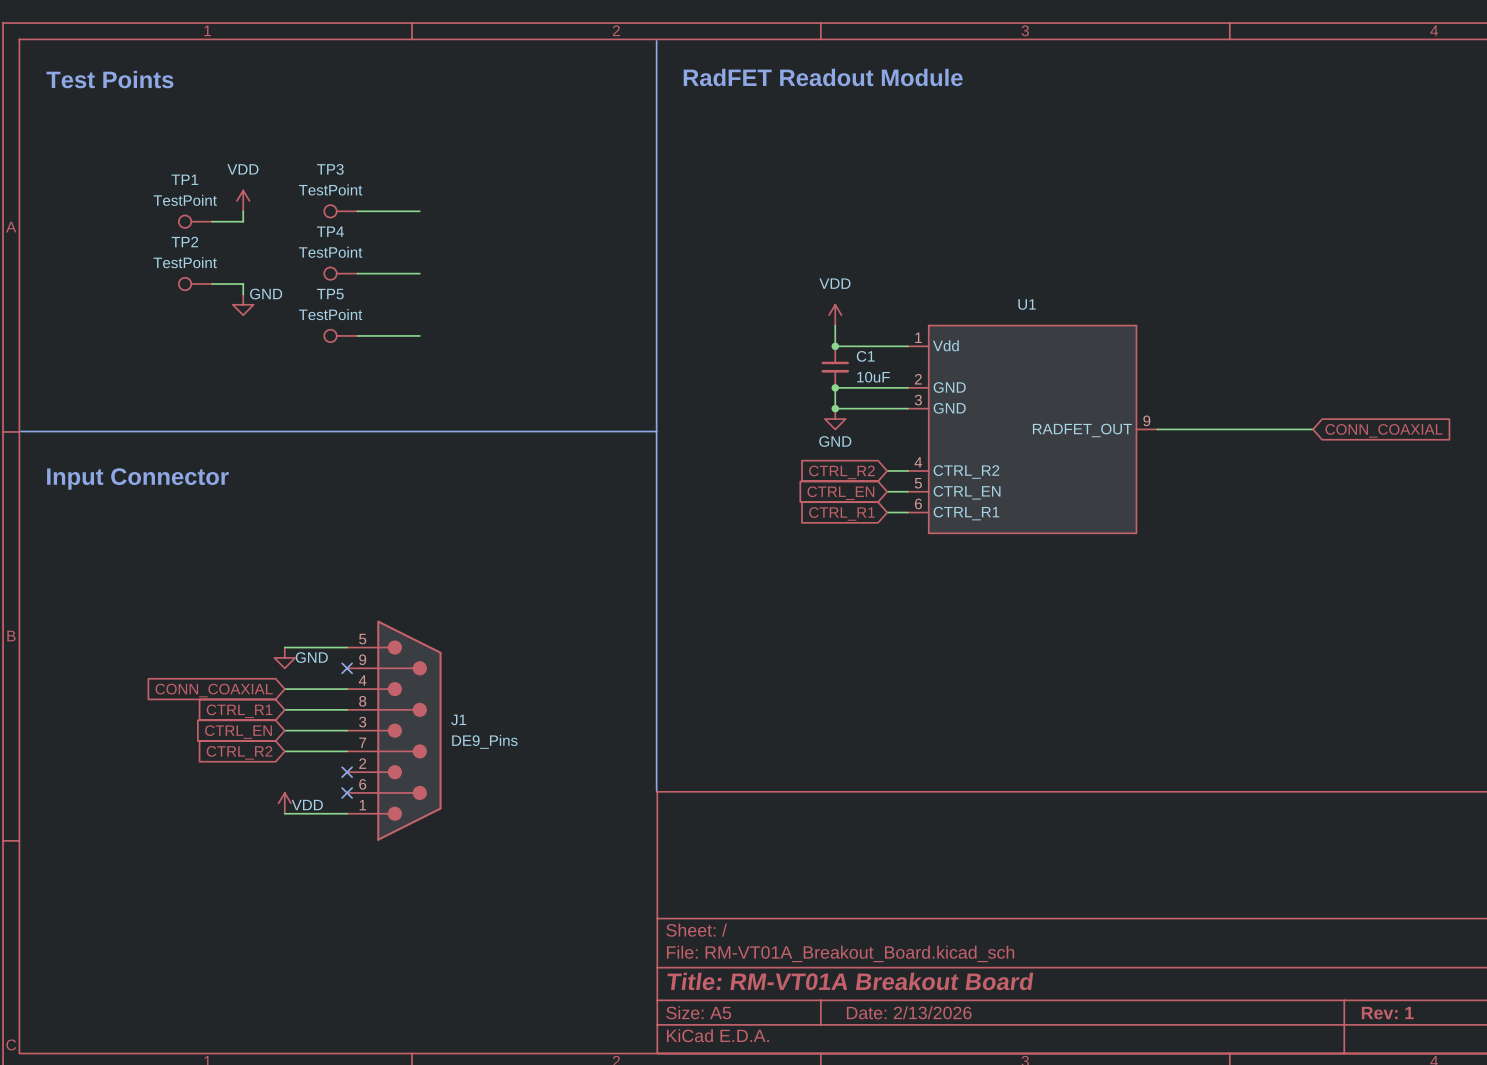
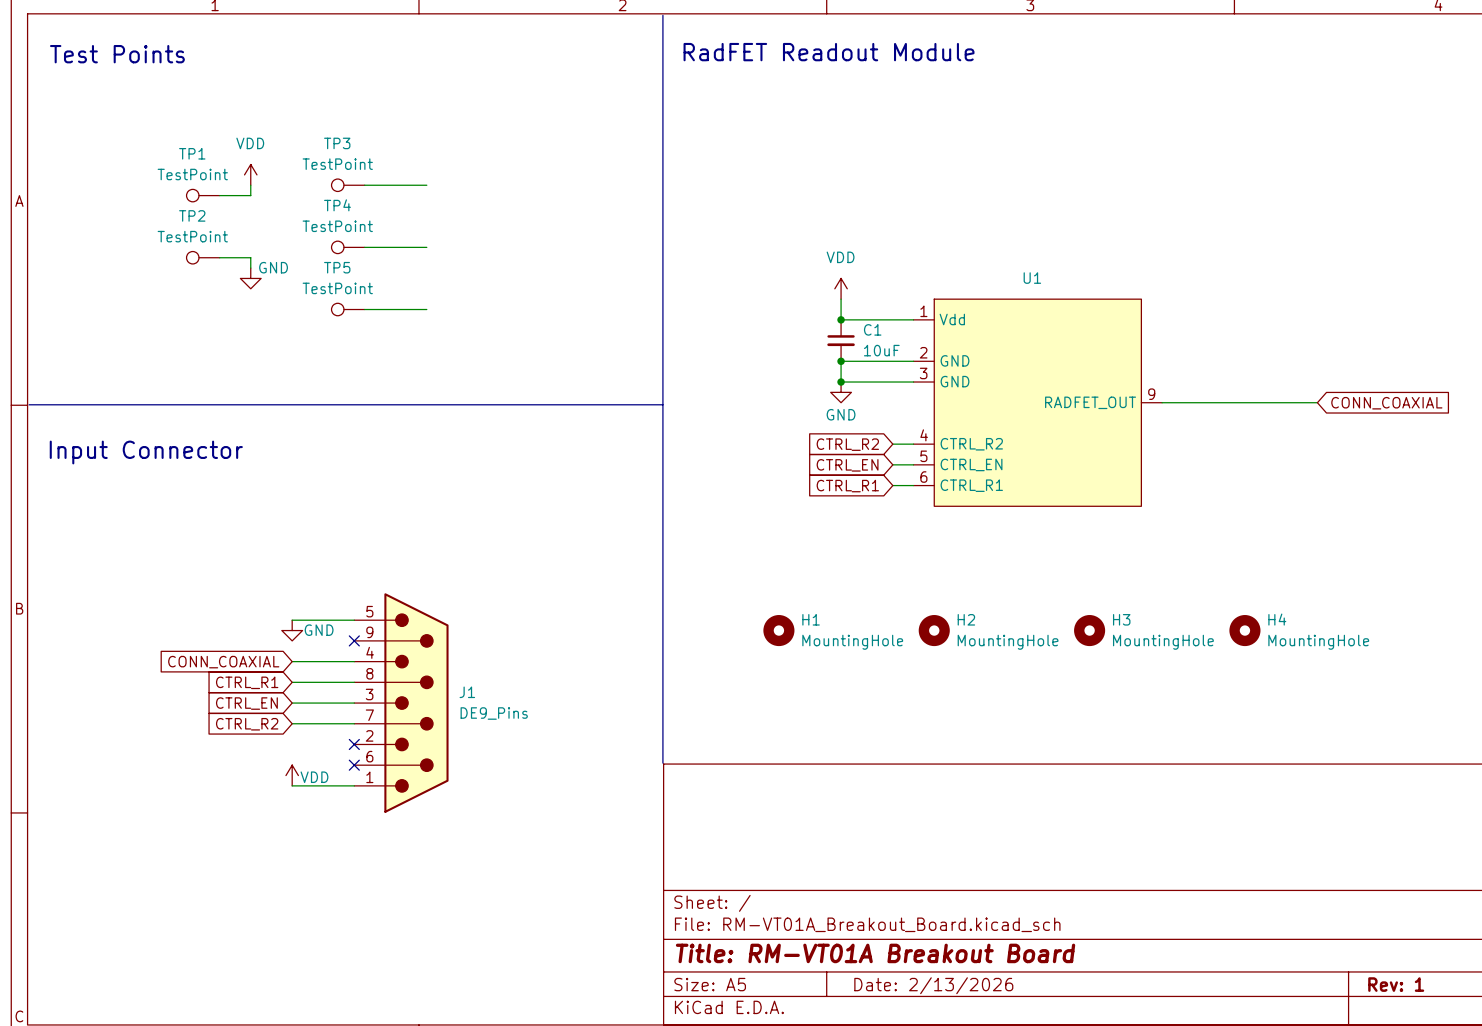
H1: none -> MountingHole (778, 630)
H2: none -> MountingHole (934, 630)
H3: none -> MountingHole (1089, 630)
H4: none -> MountingHole (1244, 630)

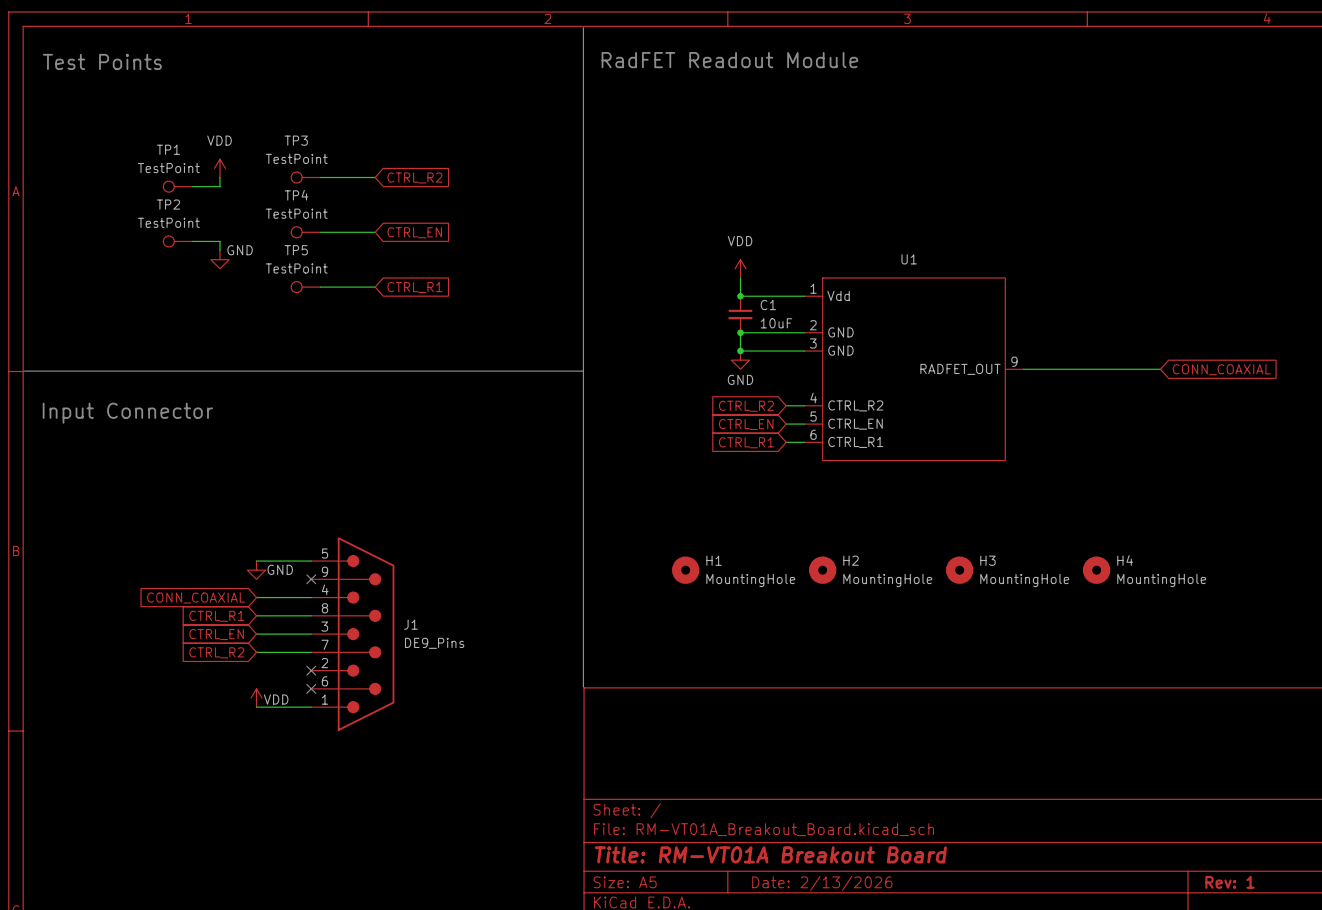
global label: none -> CTRL_R2 (414, 177)
global label: none -> CTRL_EN (414, 232)
global label: none -> CTRL_R1 (414, 287)

